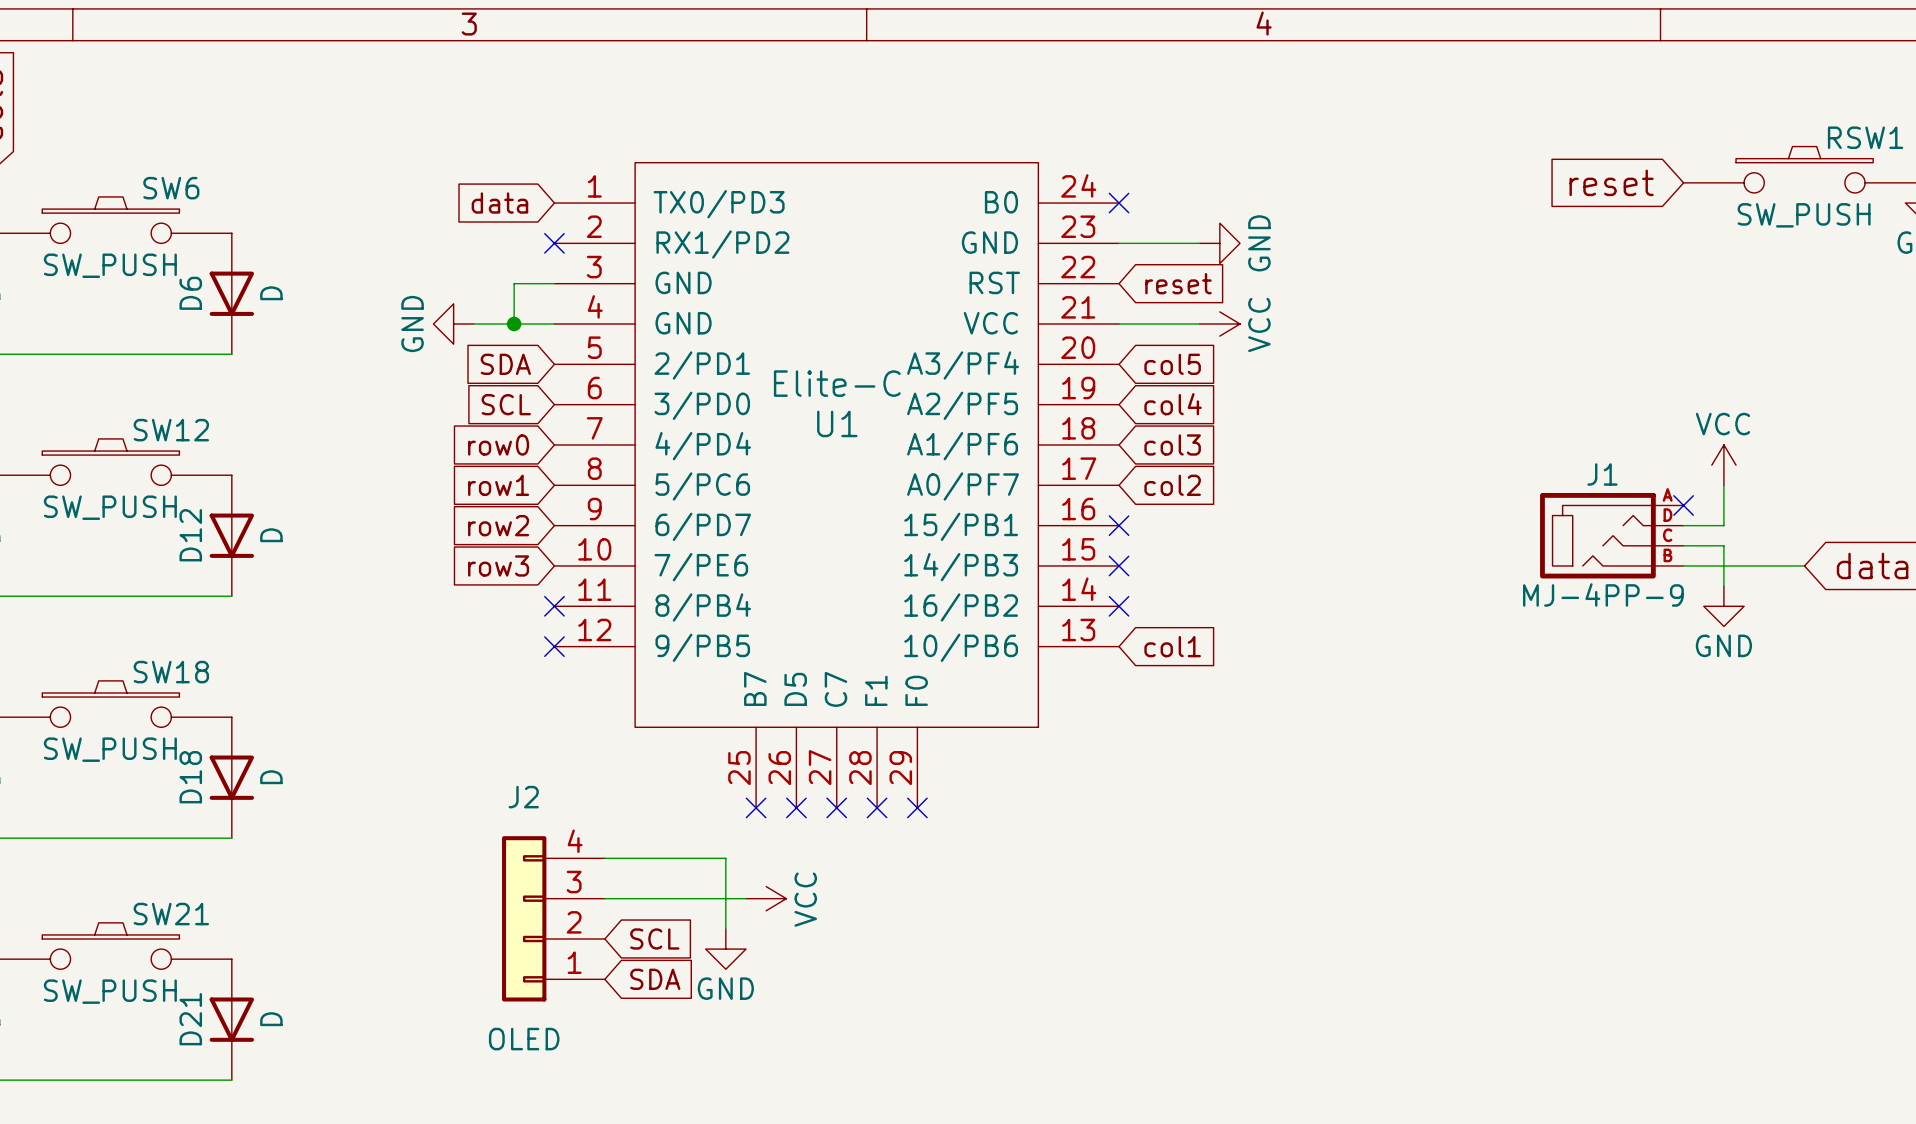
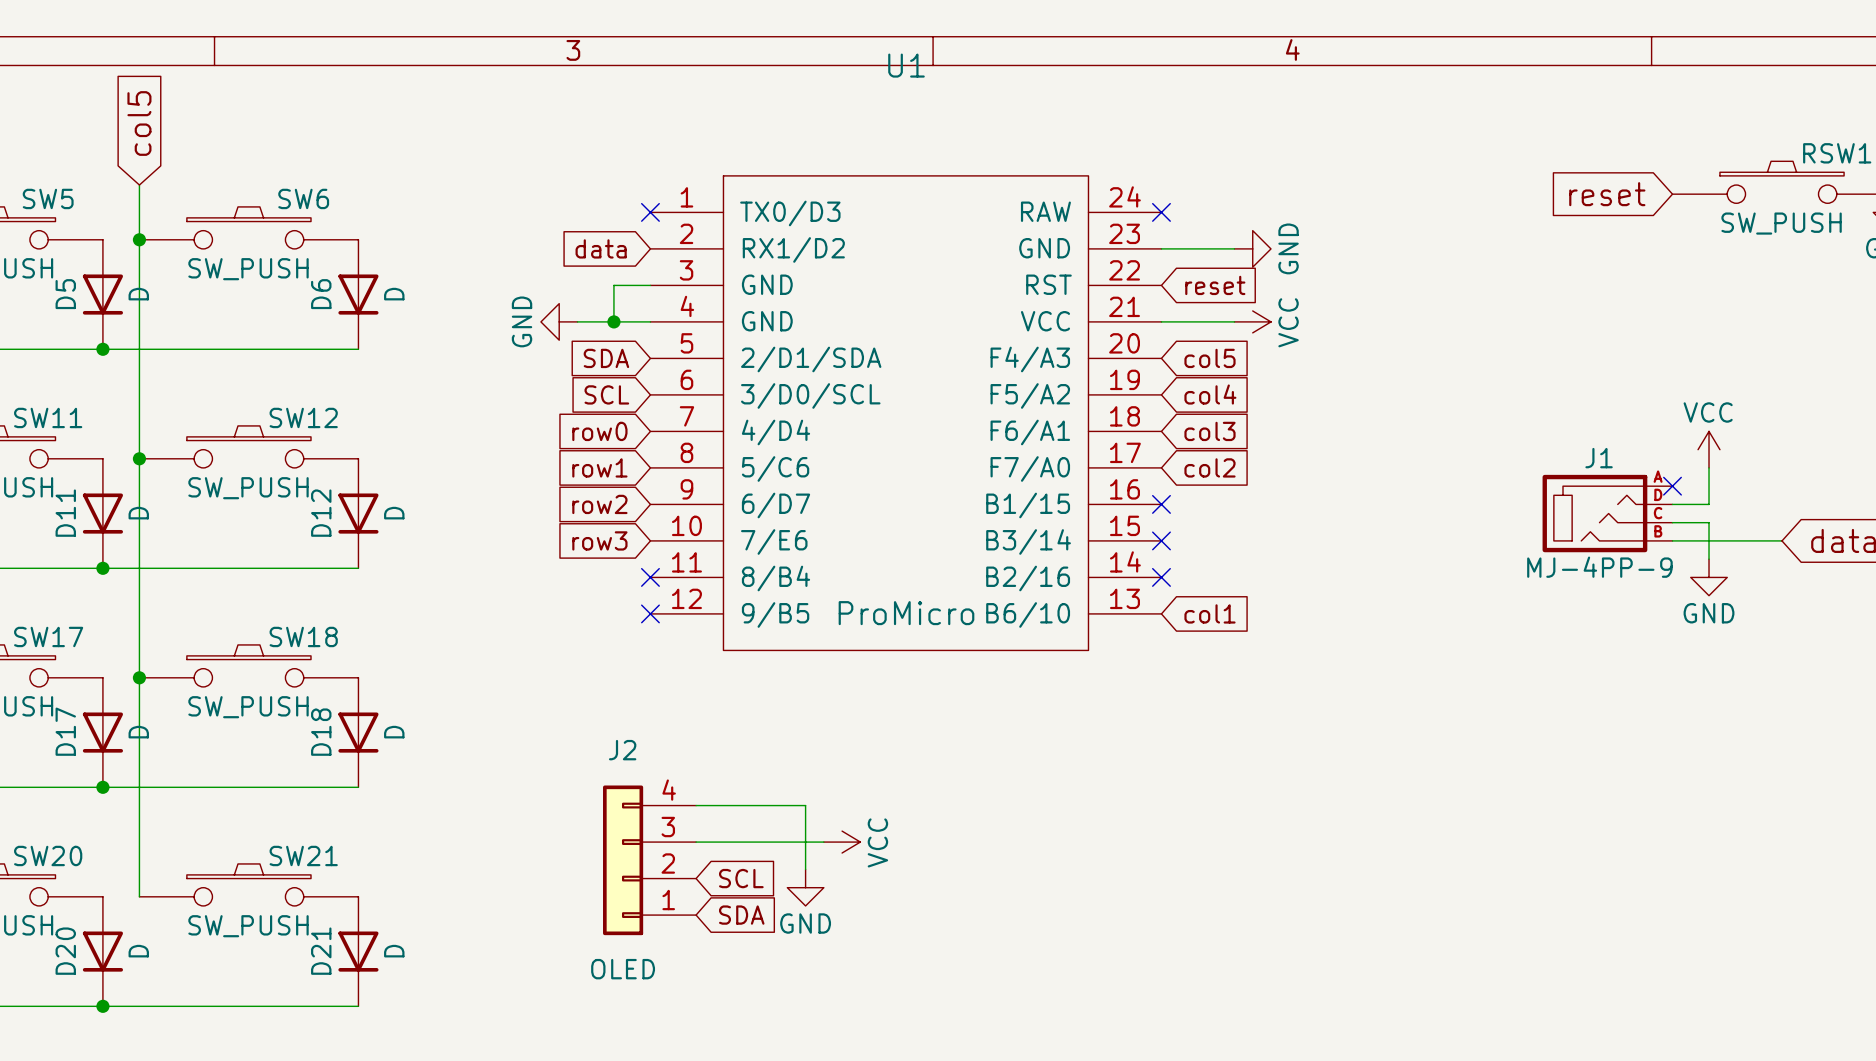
U1 symbol: [554, 162, 1120, 808] -> [650, 175, 1162, 651]
global label position: data (499, 203) -> data (601, 248)
no-connect mark position: (554, 243) -> (650, 212)
U1 value: Elite-C (837, 383) -> ProMicro (906, 613)
U1 name position: U1 (837, 423) -> U1 (906, 65)
no-connect mark: (756, 807) -> none
no-connect mark: (796, 807) -> none
no-connect mark: (836, 807) -> none
no-connect mark: (877, 807) -> none
no-connect mark: (917, 807) -> none

